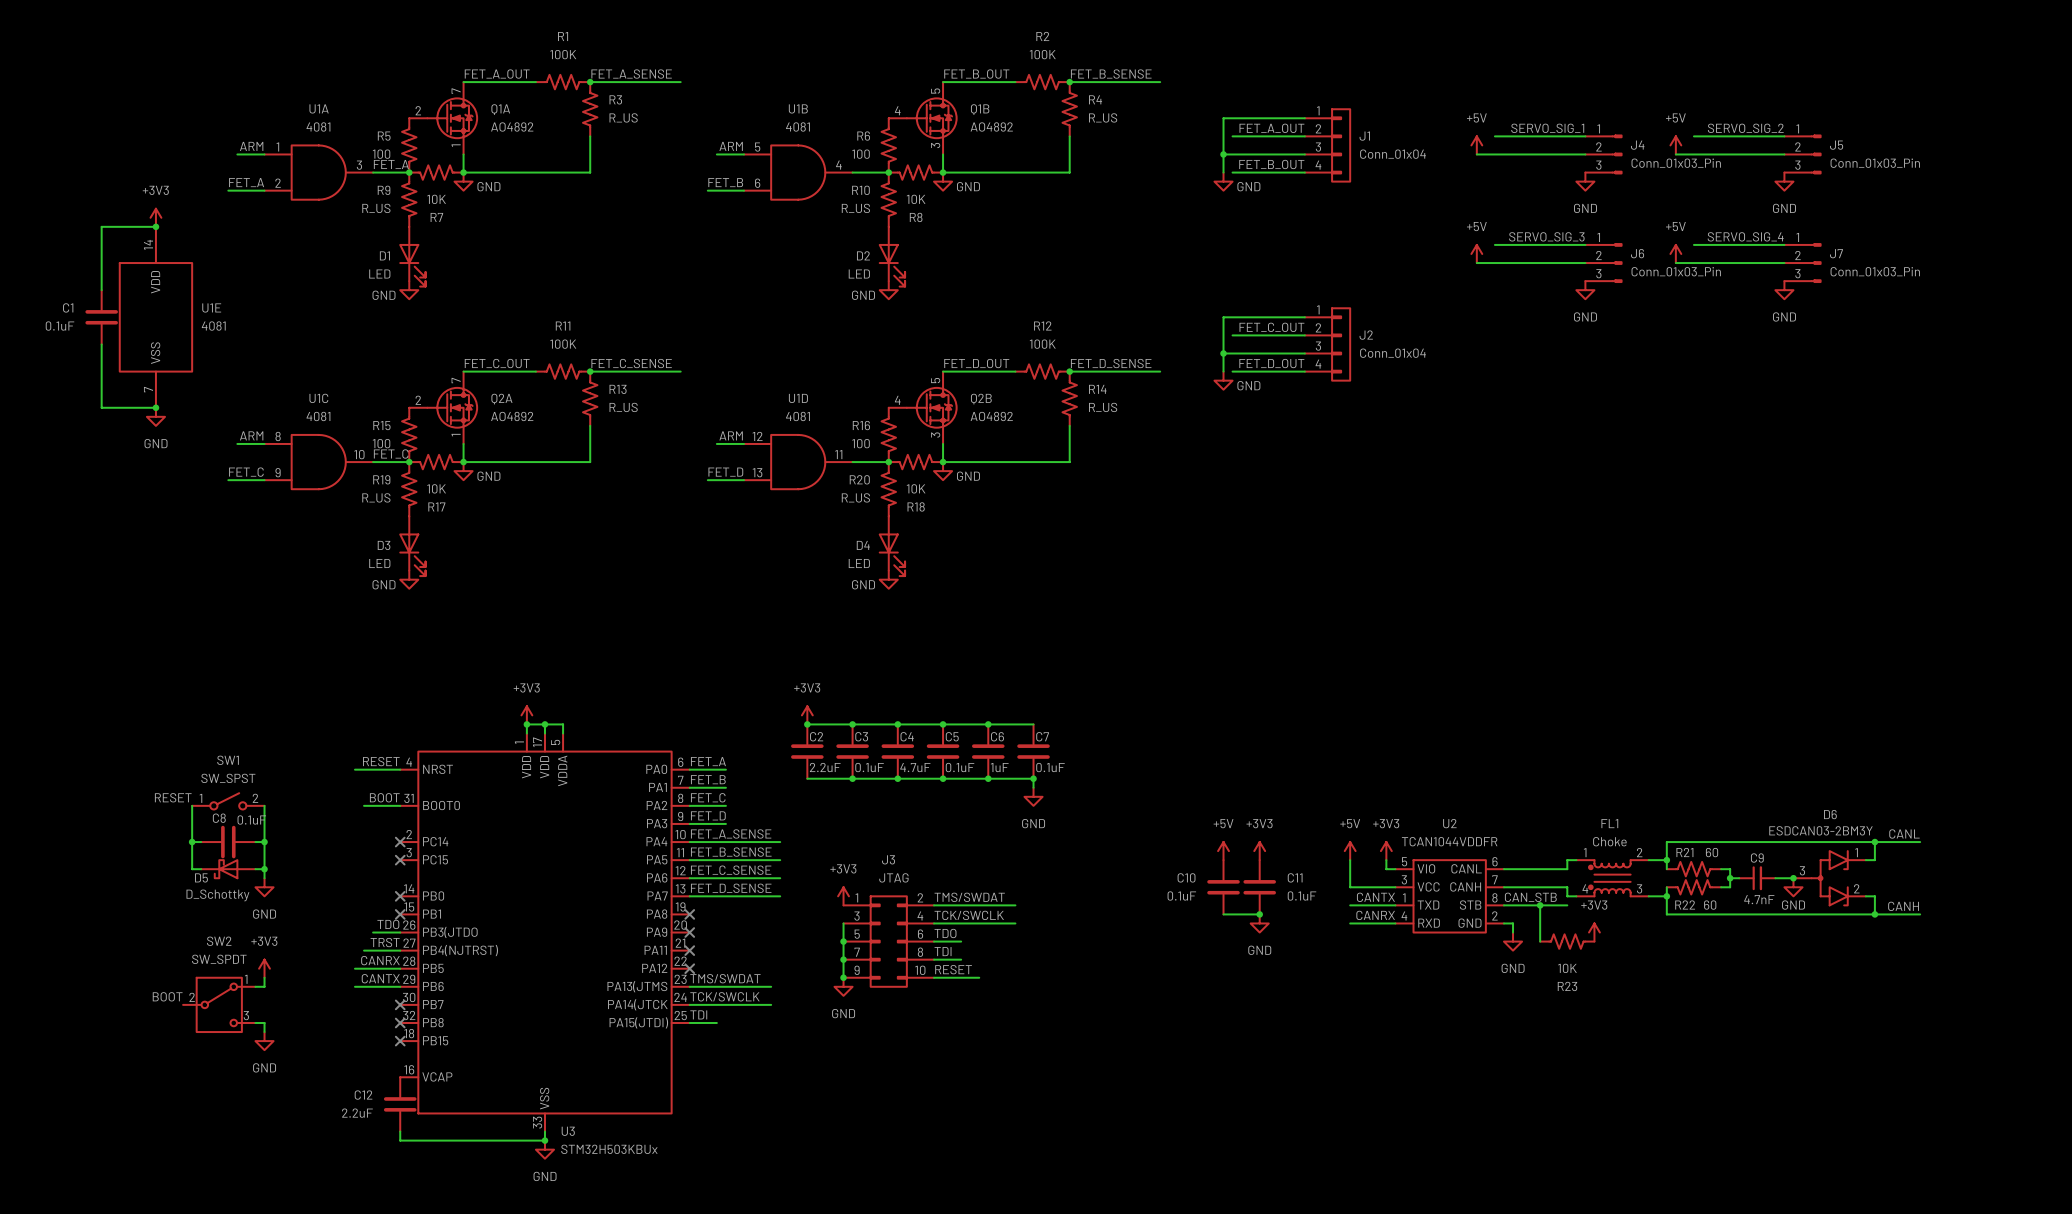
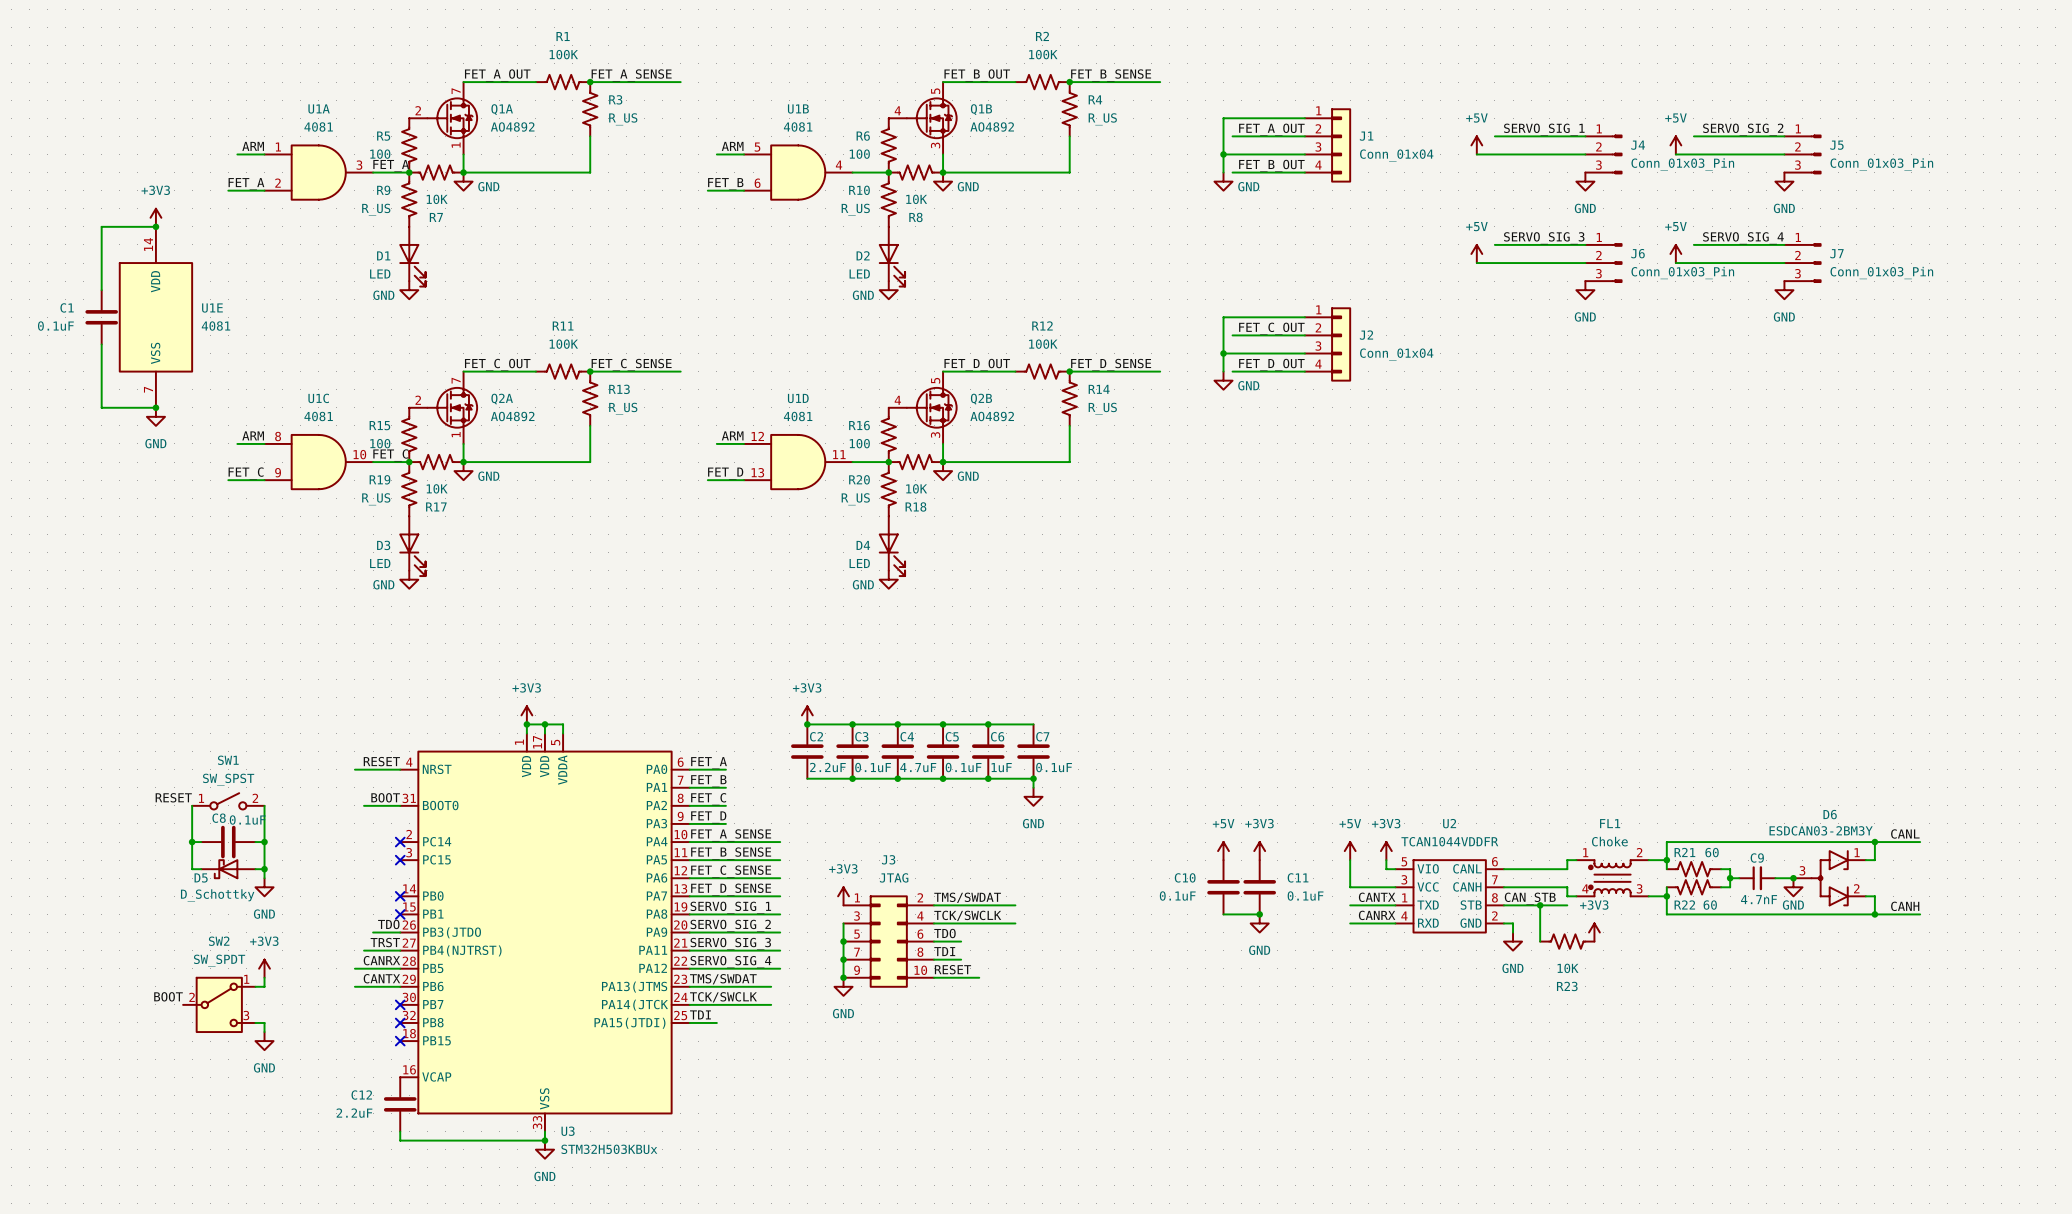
label: none -> SERVO_SIG_1 (730, 907)
wire: none -> (689, 914) (780, 914)
no-connect mark: (689, 914) -> none
label: none -> SERVO_SIG_2 (730, 925)
wire: none -> (689, 932) (780, 932)
no-connect mark: (689, 932) -> none
label: none -> SERVO_SIG_3 (730, 943)
wire: none -> (689, 950) (780, 950)
no-connect mark: (689, 950) -> none
label: none -> SERVO_SIG_4 (730, 962)
wire: none -> (689, 968) (780, 968)
no-connect mark: (689, 968) -> none

